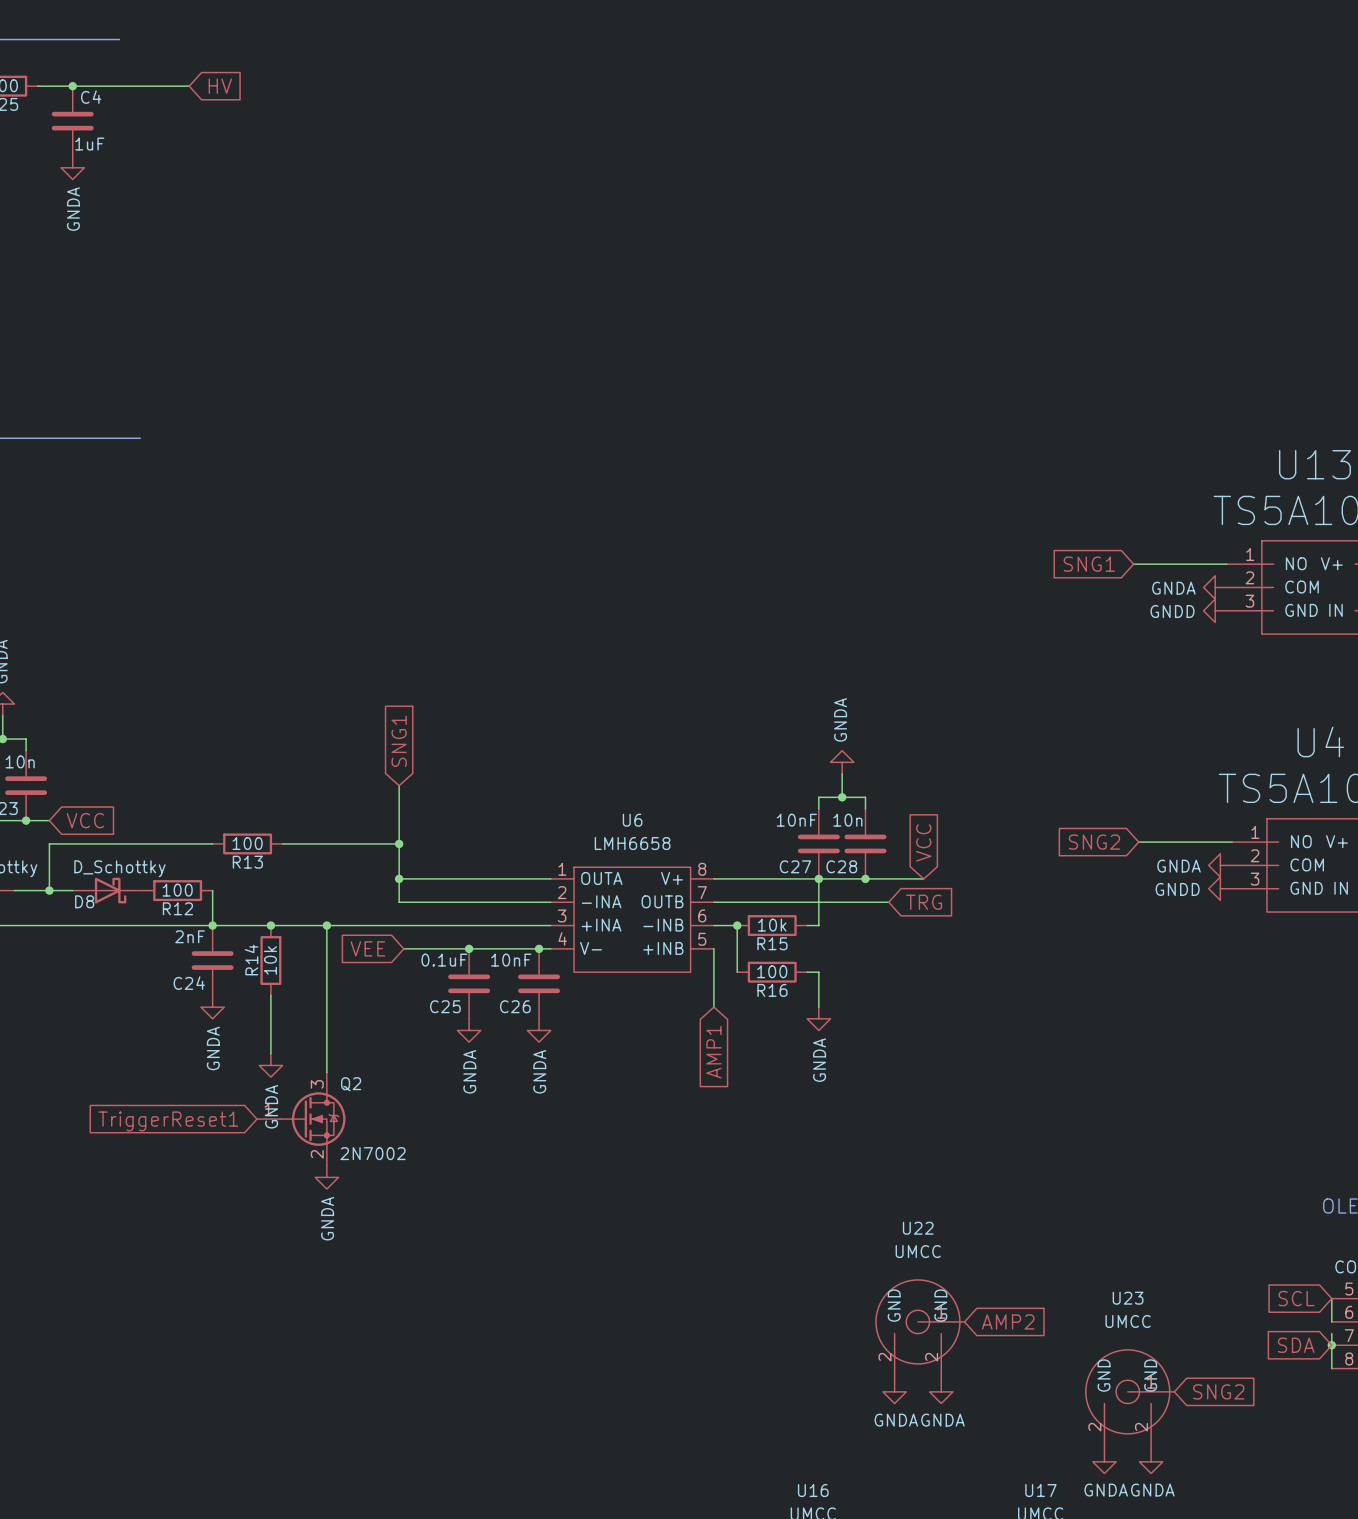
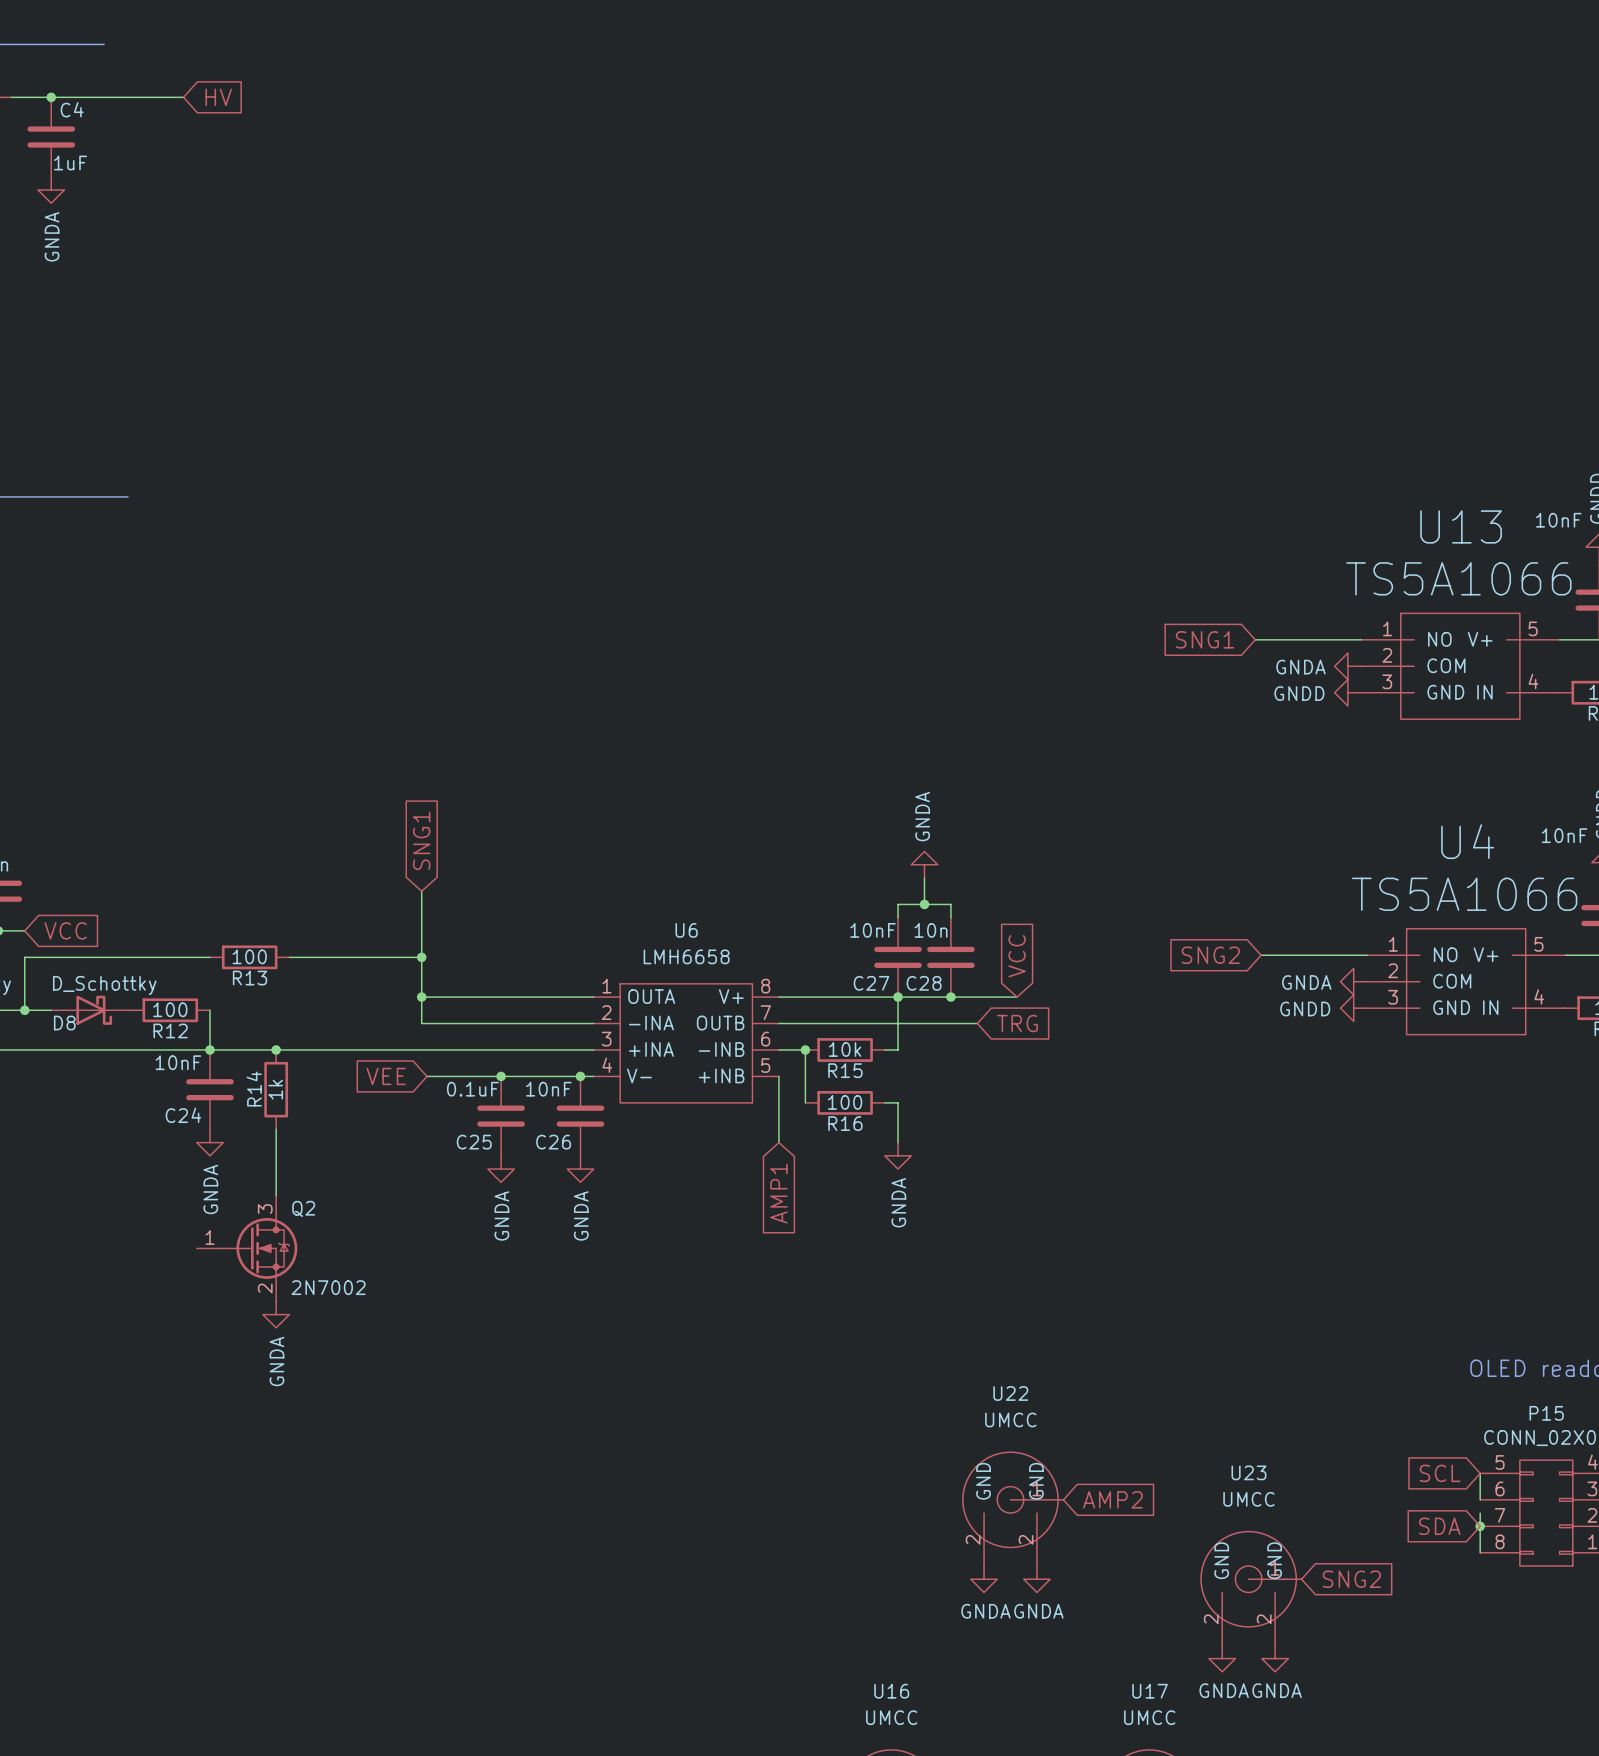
wire: (326, 925) (326, 1072) -> none
junction: (326, 925) -> none
C24 value: 2nF (190, 936) -> 10nF (178, 1062)
R14 value: 10k (270, 960) -> 1k (275, 1089)
power symbol: GNDA (270, 1065) -> none
Q2 position: (301, 1119) -> (247, 1248)
global label: TriggerReset1 (168, 1121) -> none
power symbol: none -> GNDA (276, 1314)
power symbol: GNDA (326, 1177) -> none

